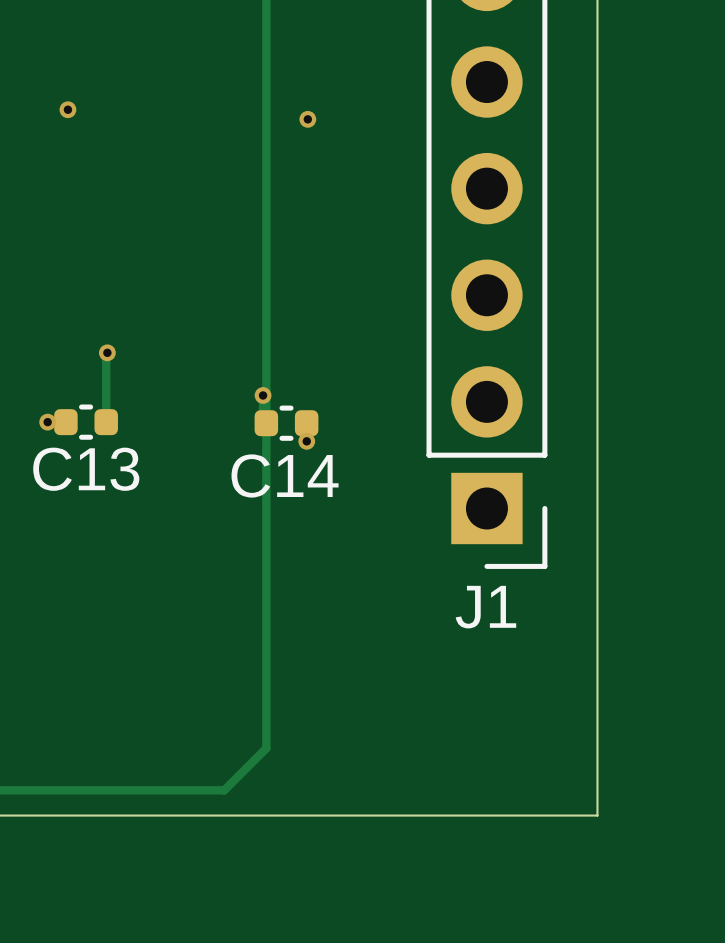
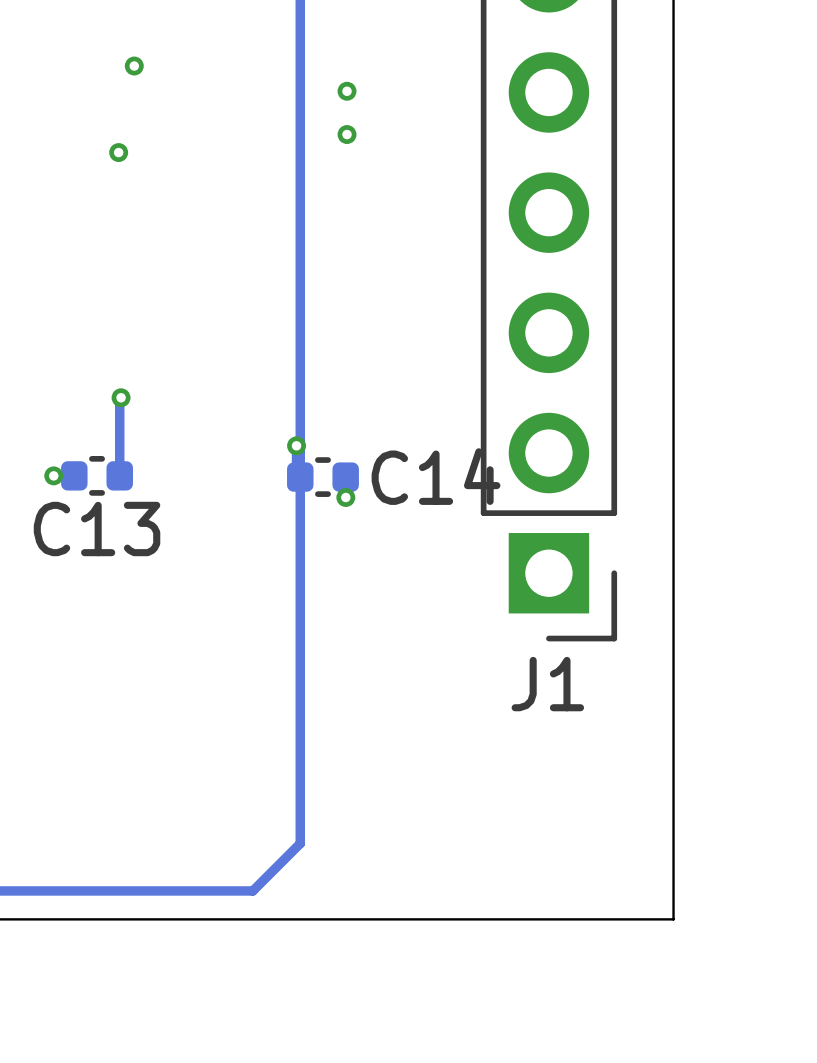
via: none -> (134, 66)
via: none -> (347, 91)
via: (67, 109) -> none
via: none -> (118, 152)
C14 name position: C14 (285, 475) -> C14 (436, 476)

